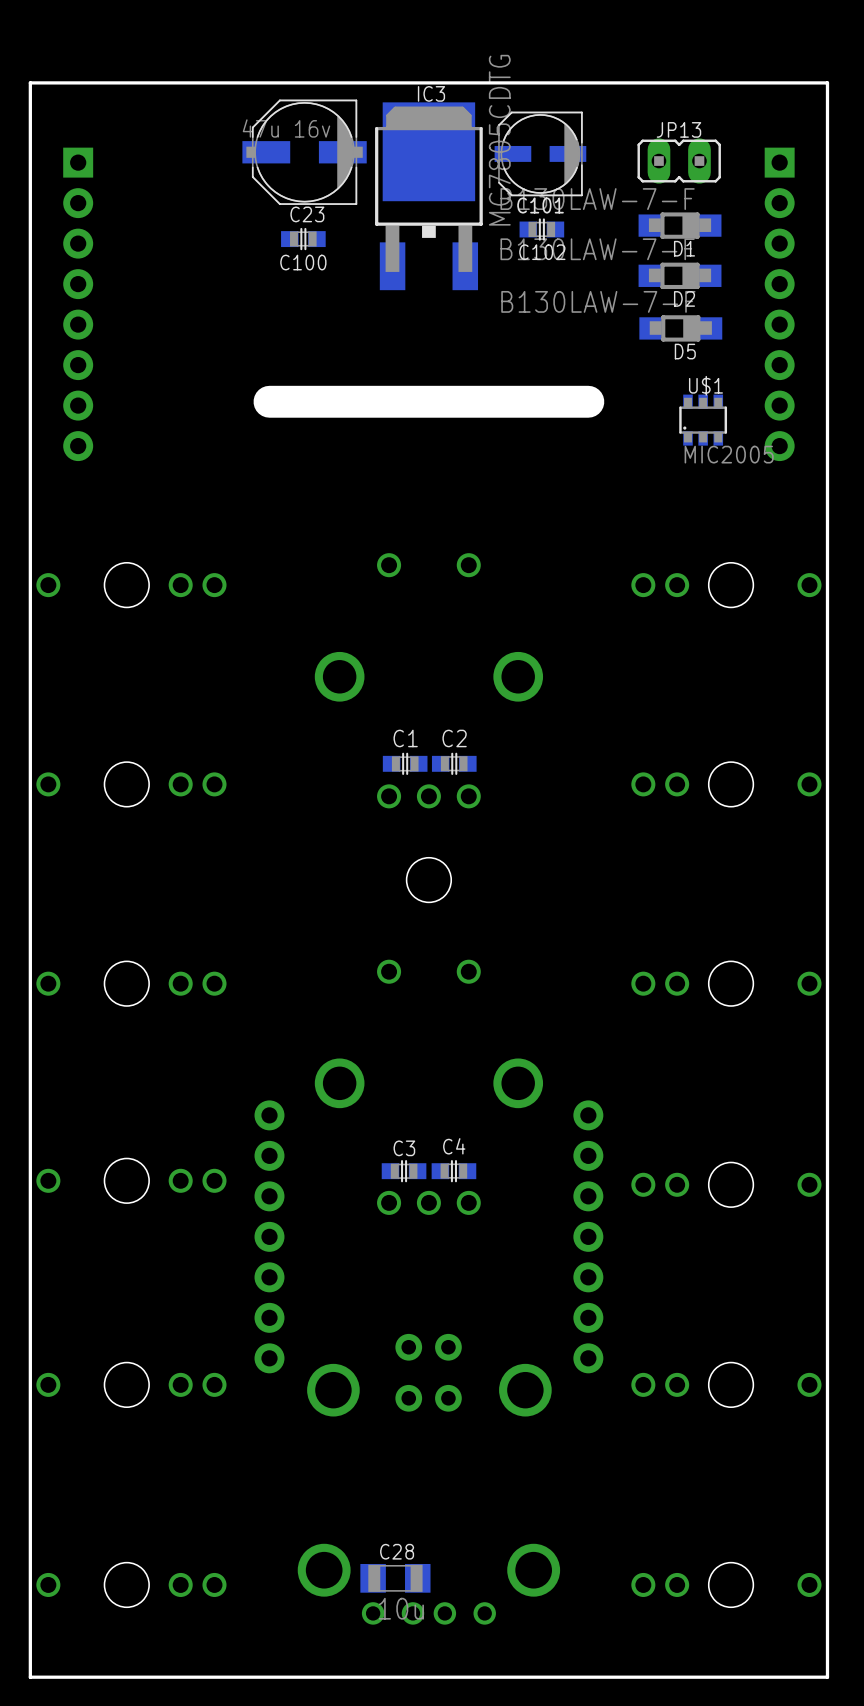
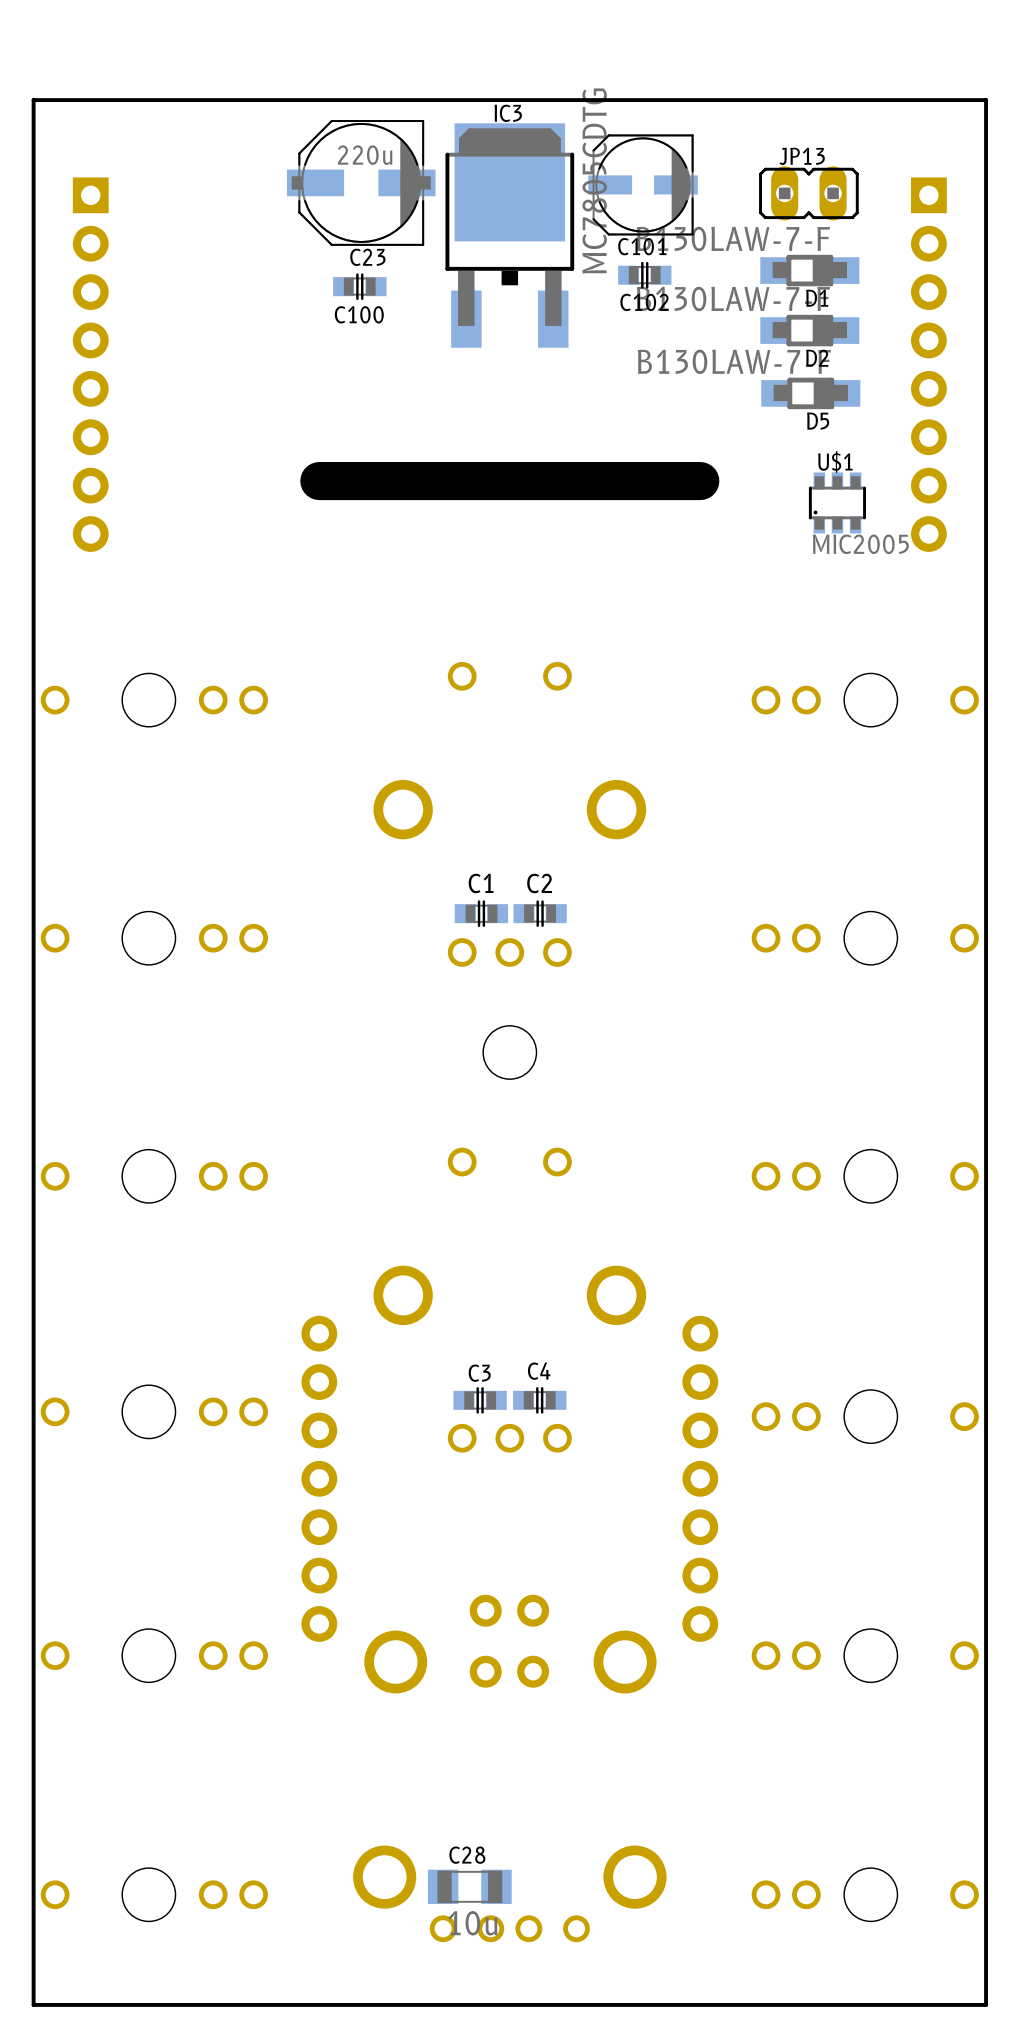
C23 value: 47u 16v (286, 128) -> 220u (365, 155)

